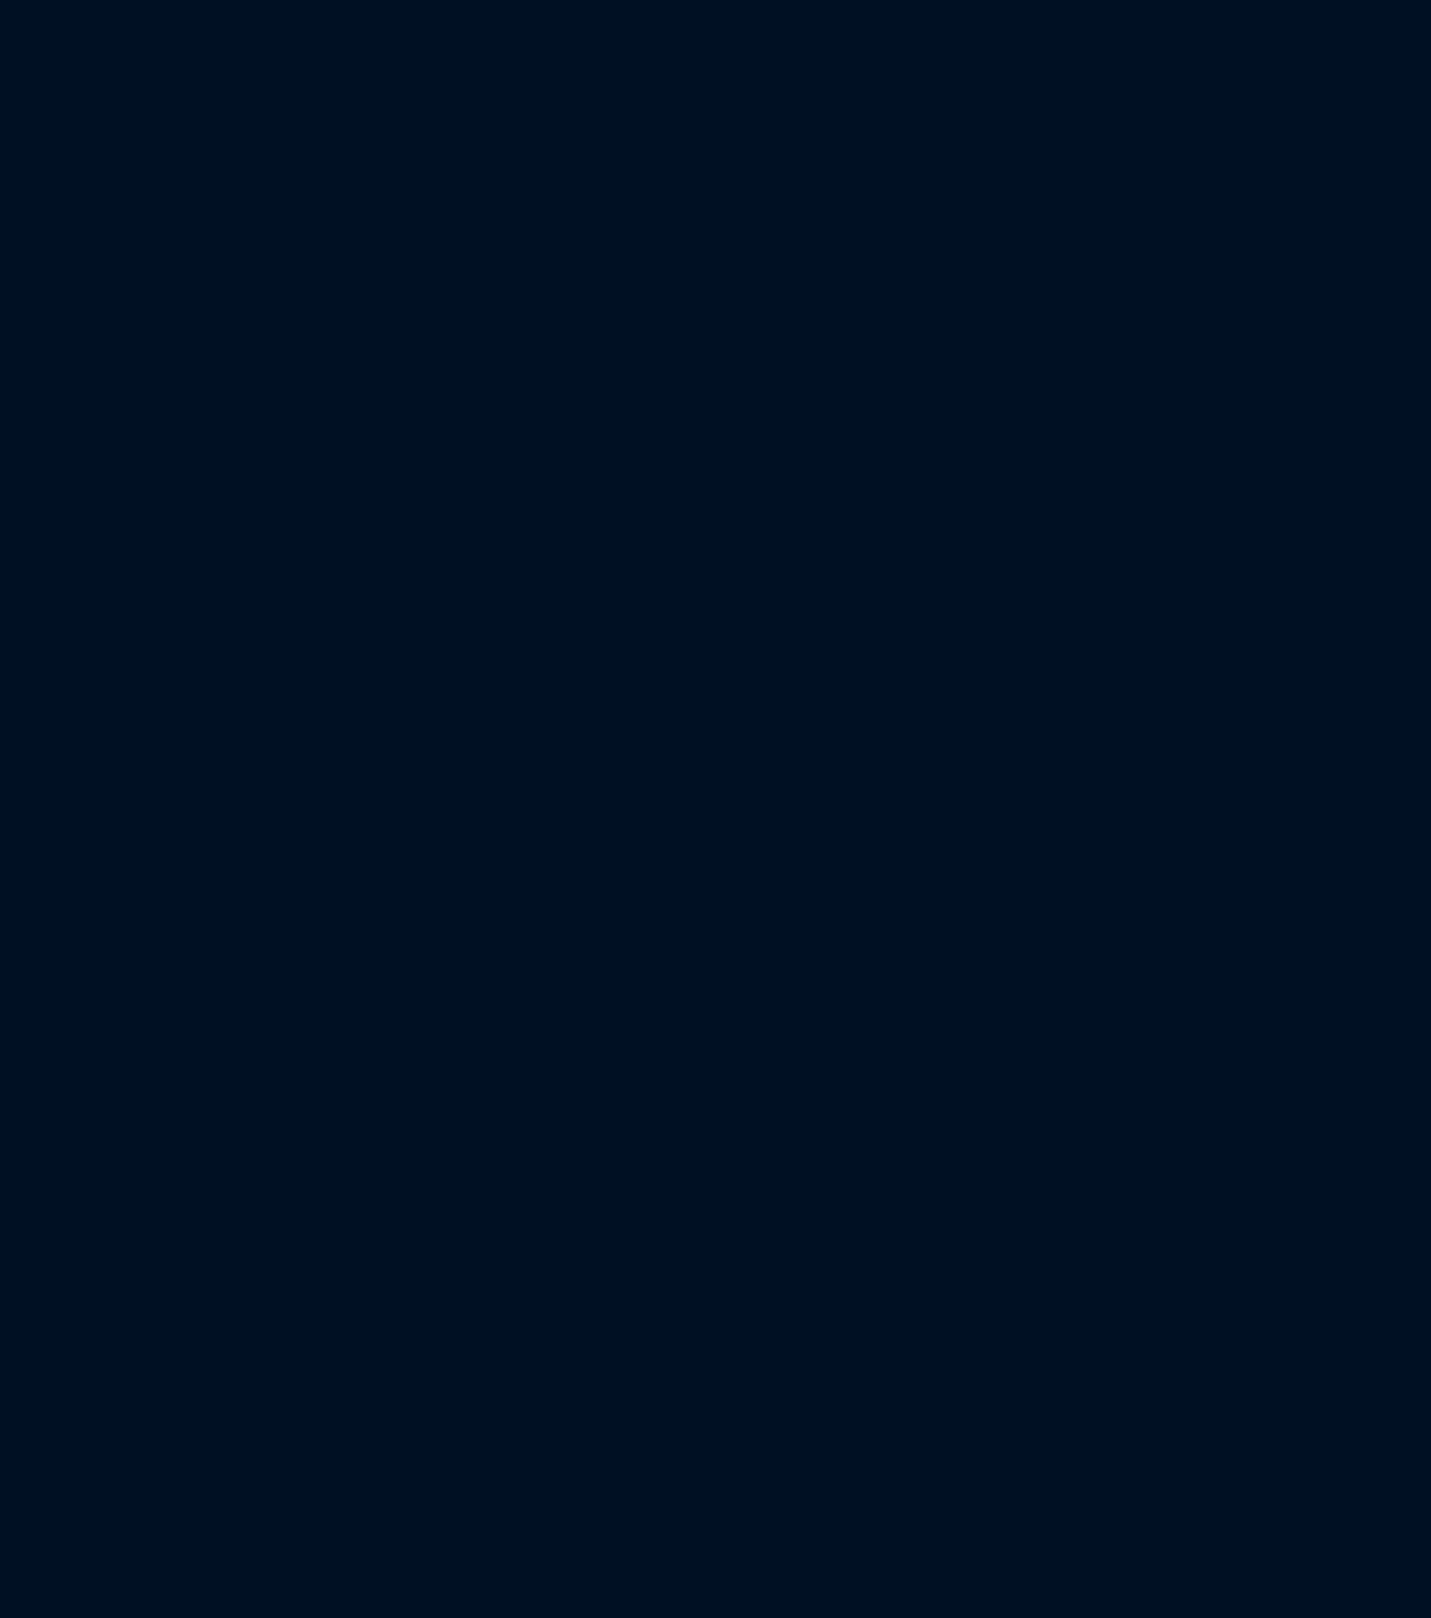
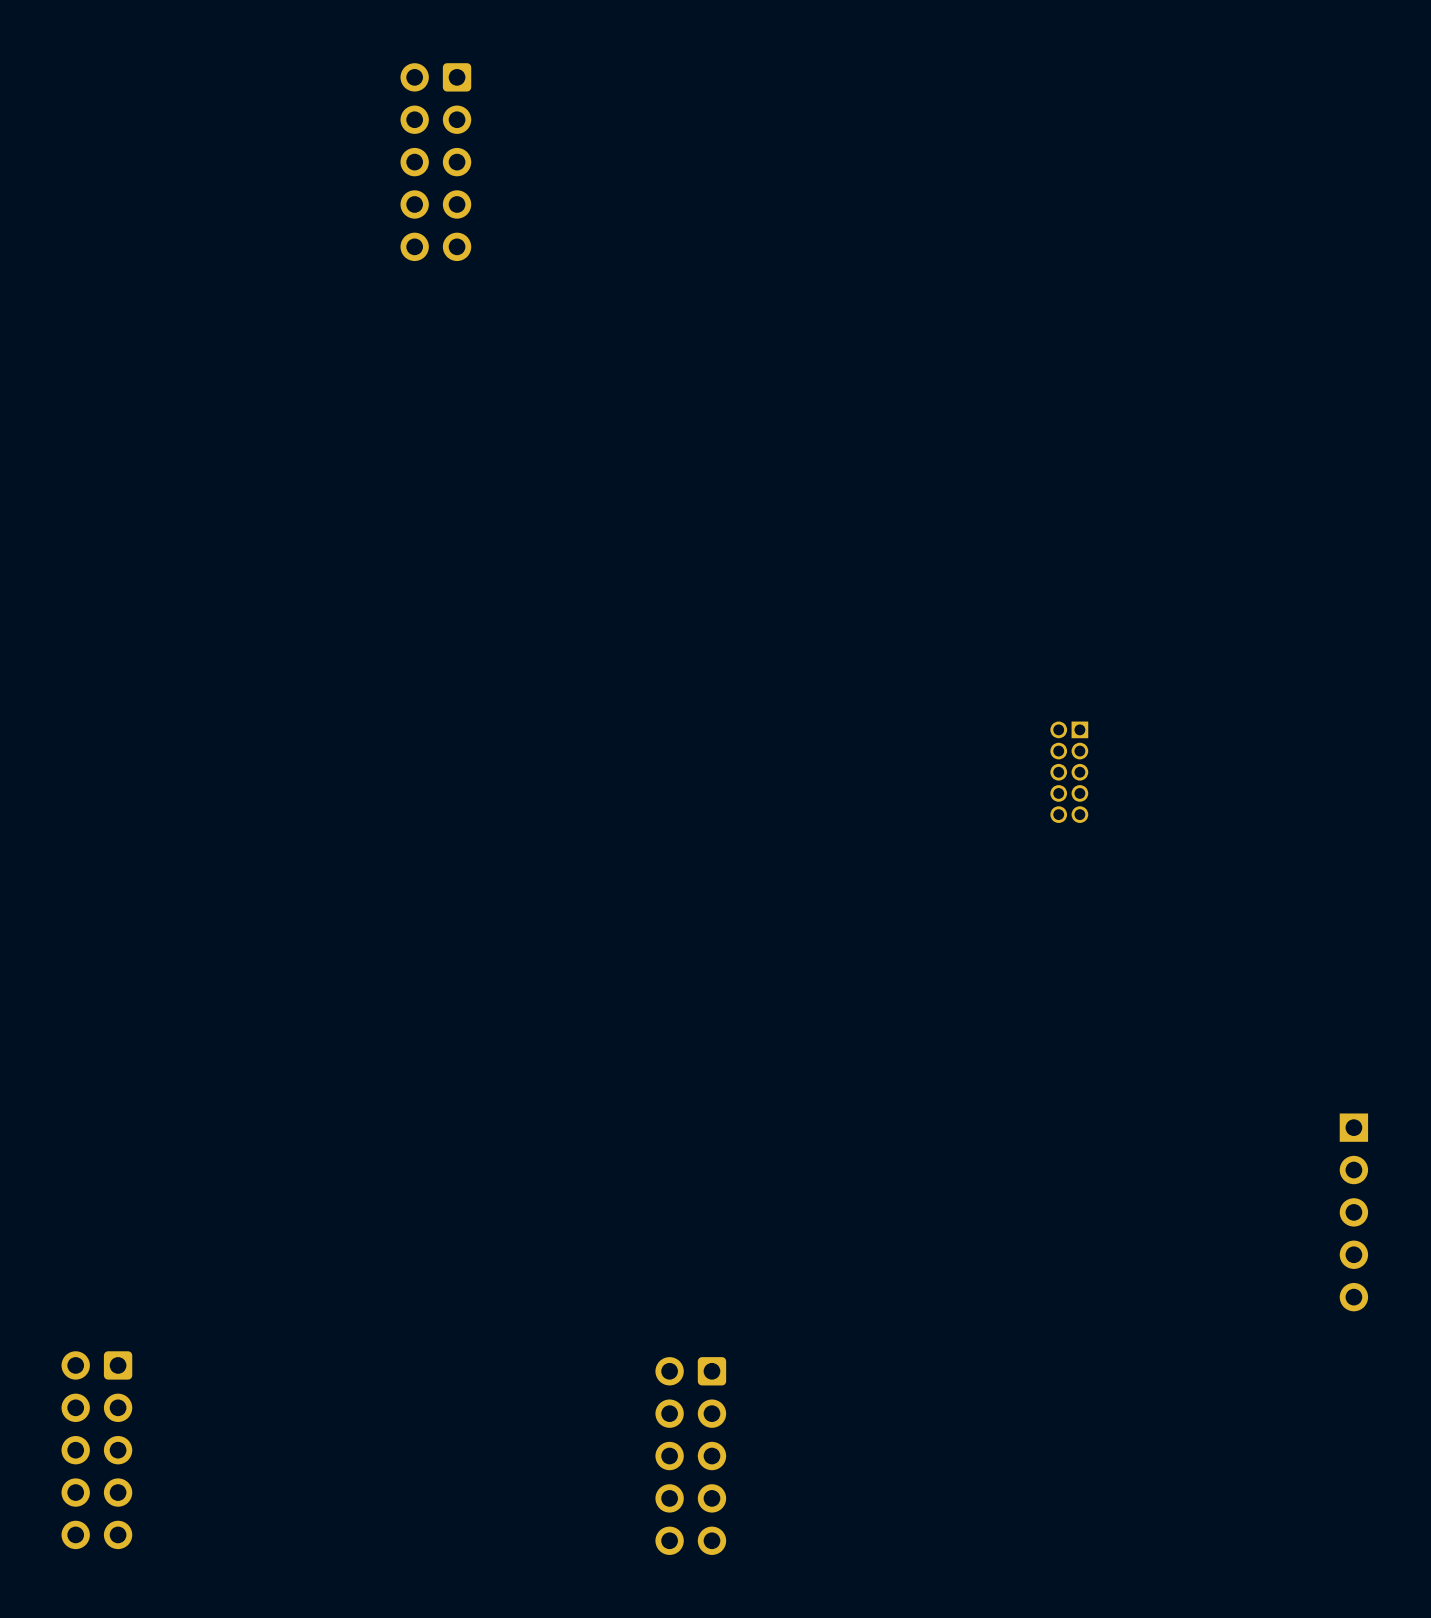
part: none -> (435, 162)
part: none -> (1069, 772)
part: none -> (1353, 1212)
part: none -> (96, 1450)
part: none -> (690, 1456)

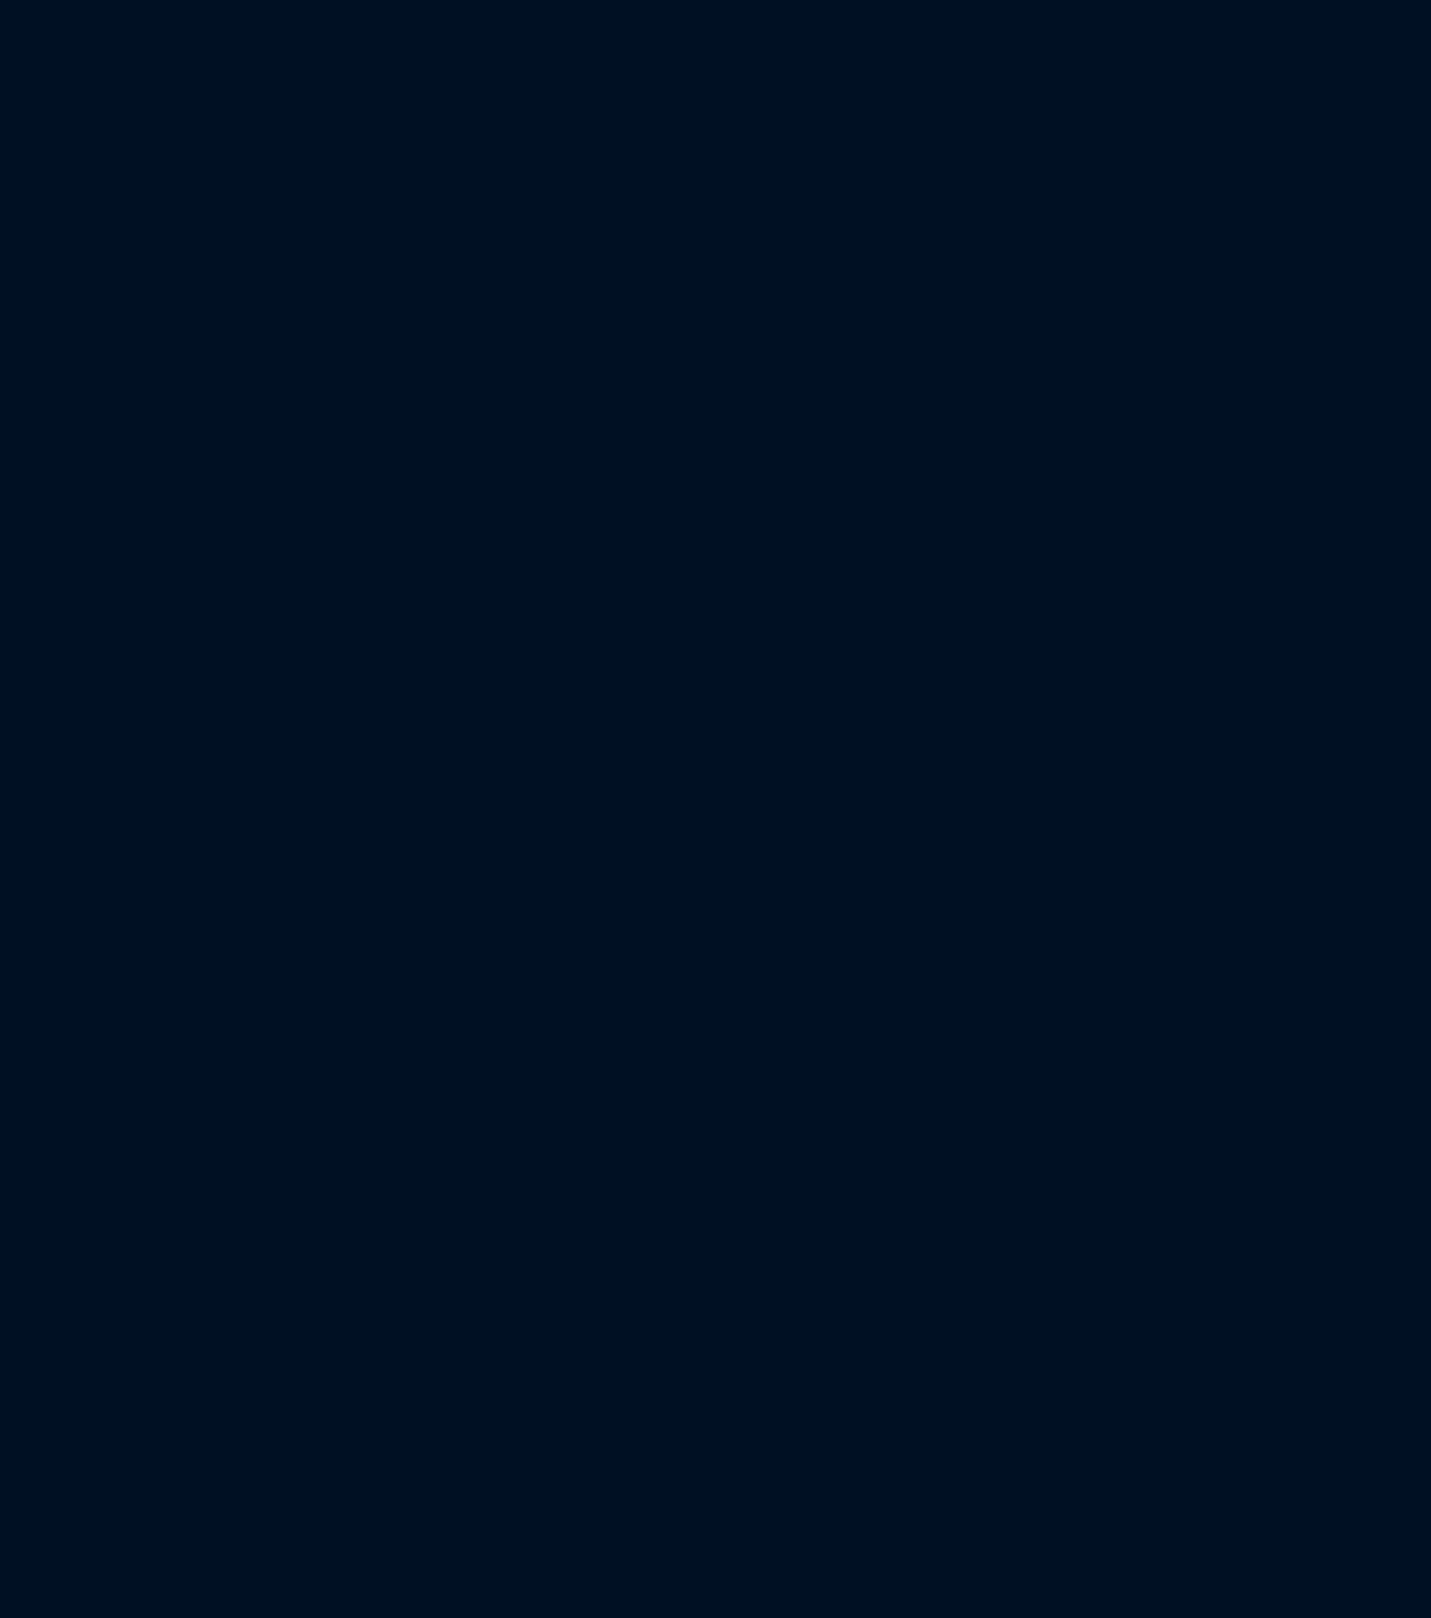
part: (435, 162) -> none
part: (1069, 772) -> none
part: (1353, 1212) -> none
part: (96, 1450) -> none
part: (690, 1456) -> none

